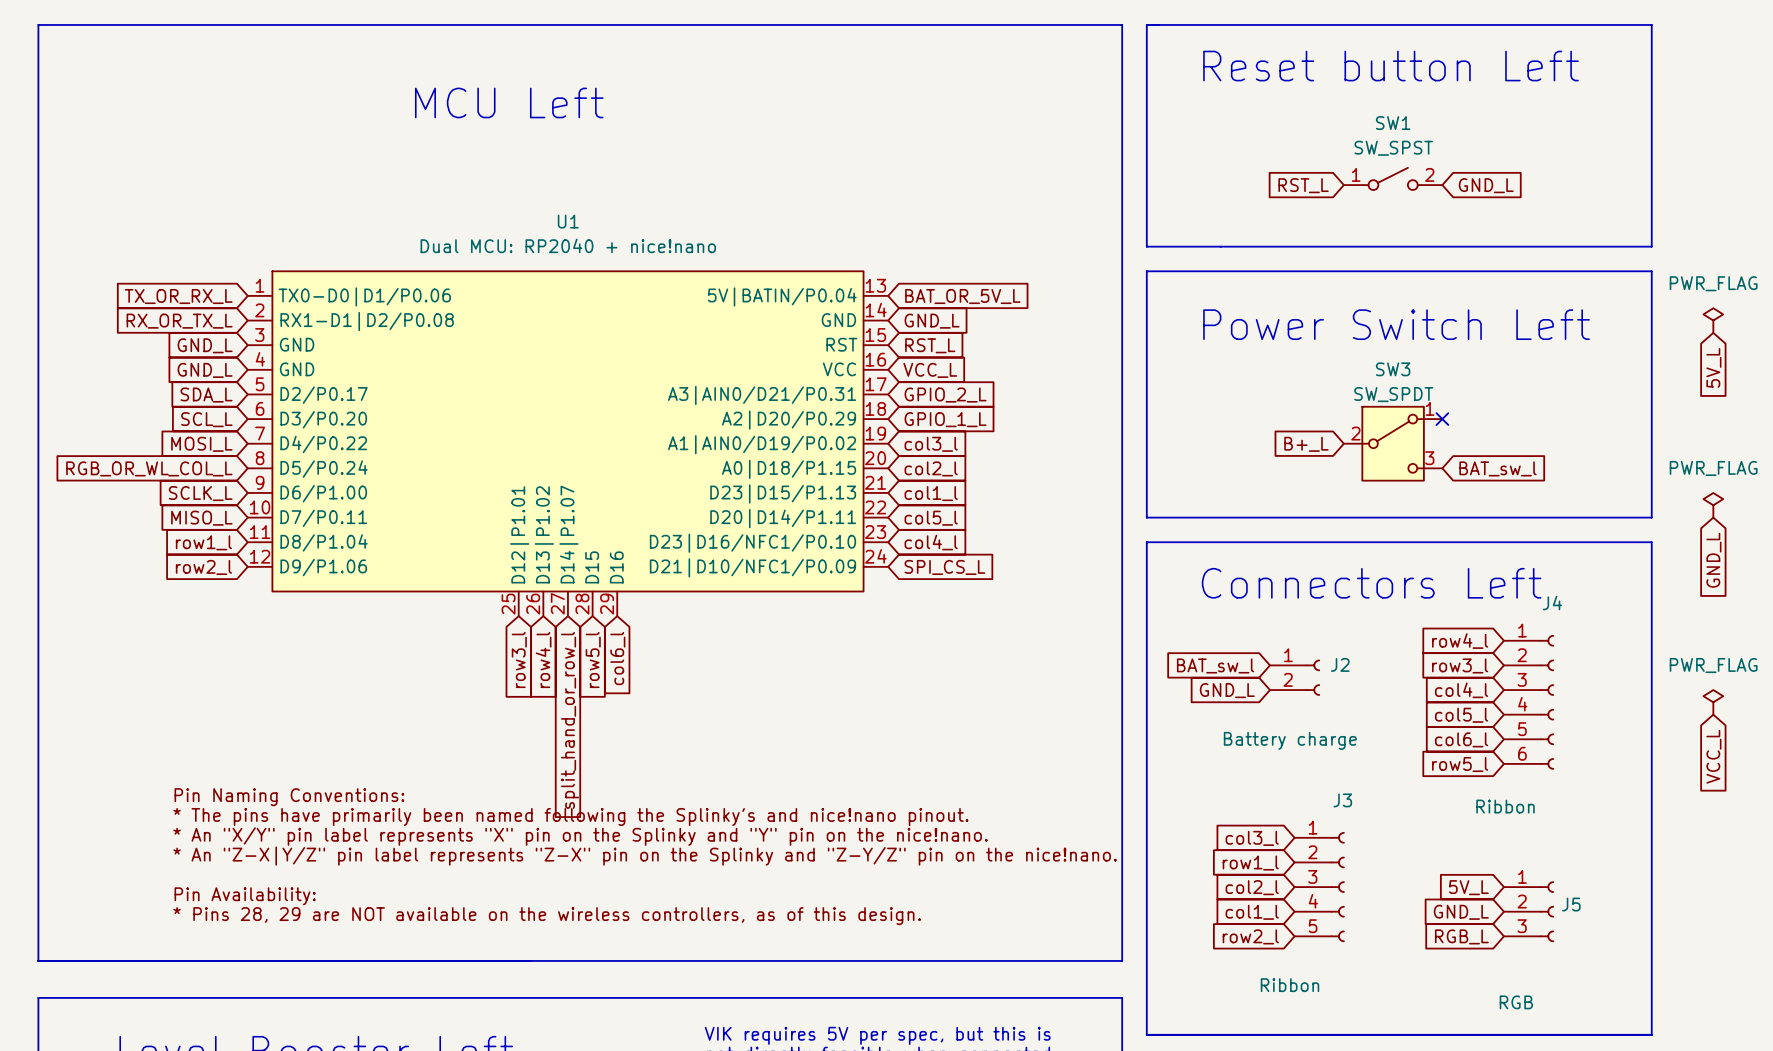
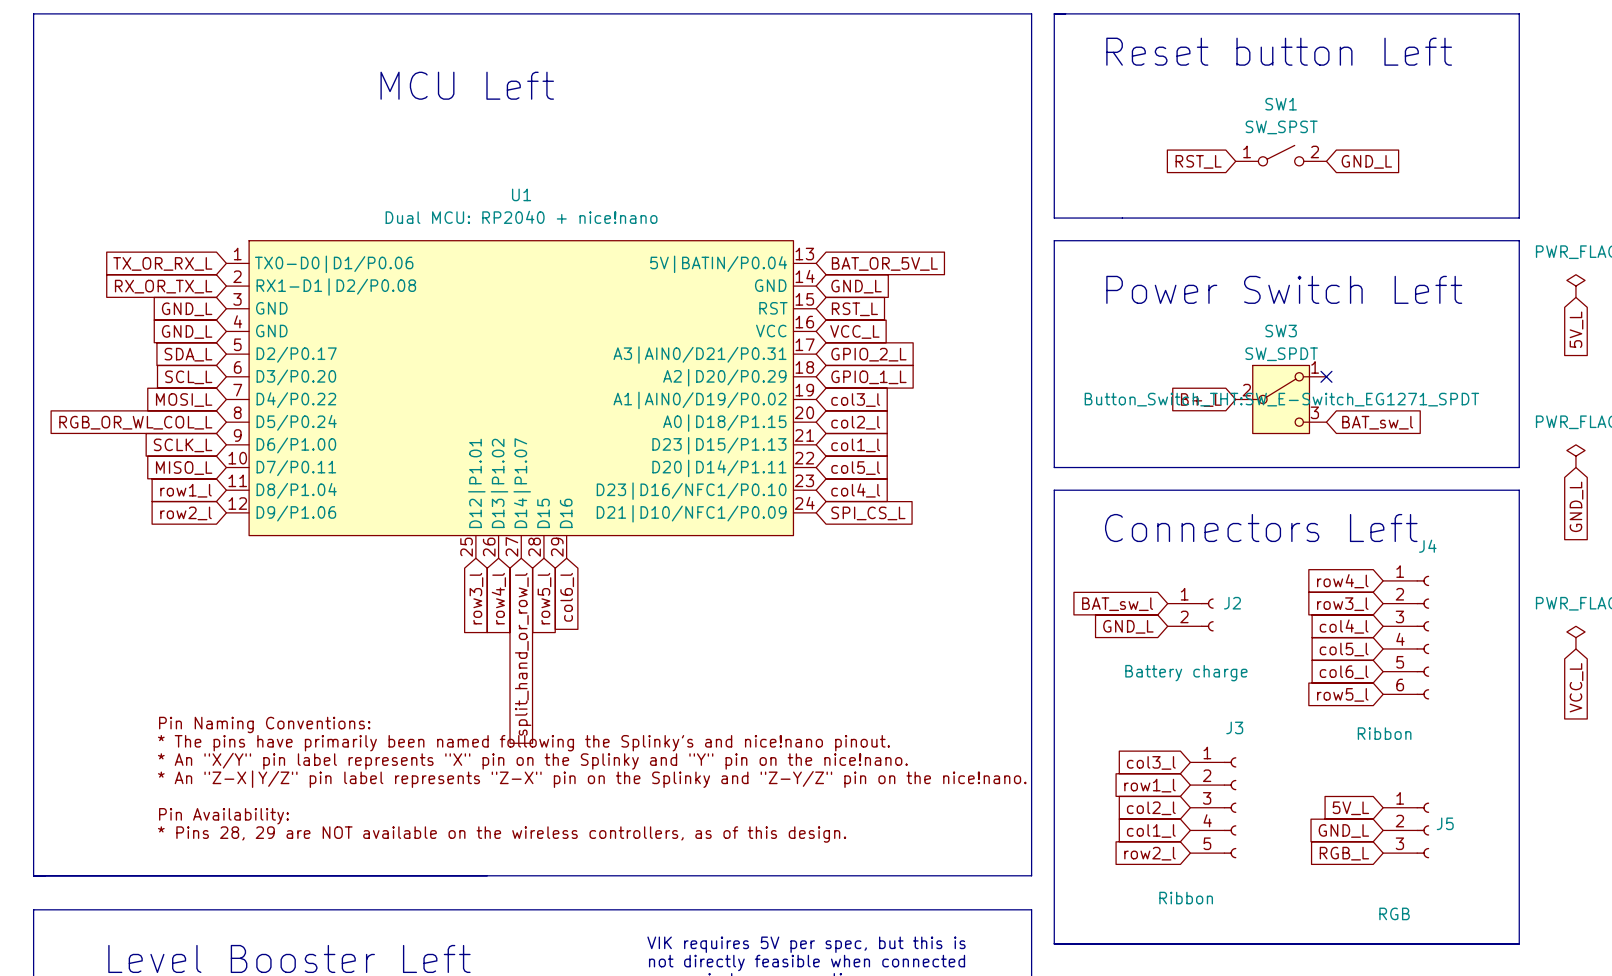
SW3 text: none -> Button_Switch_THT:SW_E-Switch_EG1271_SPDT (1281, 399)

